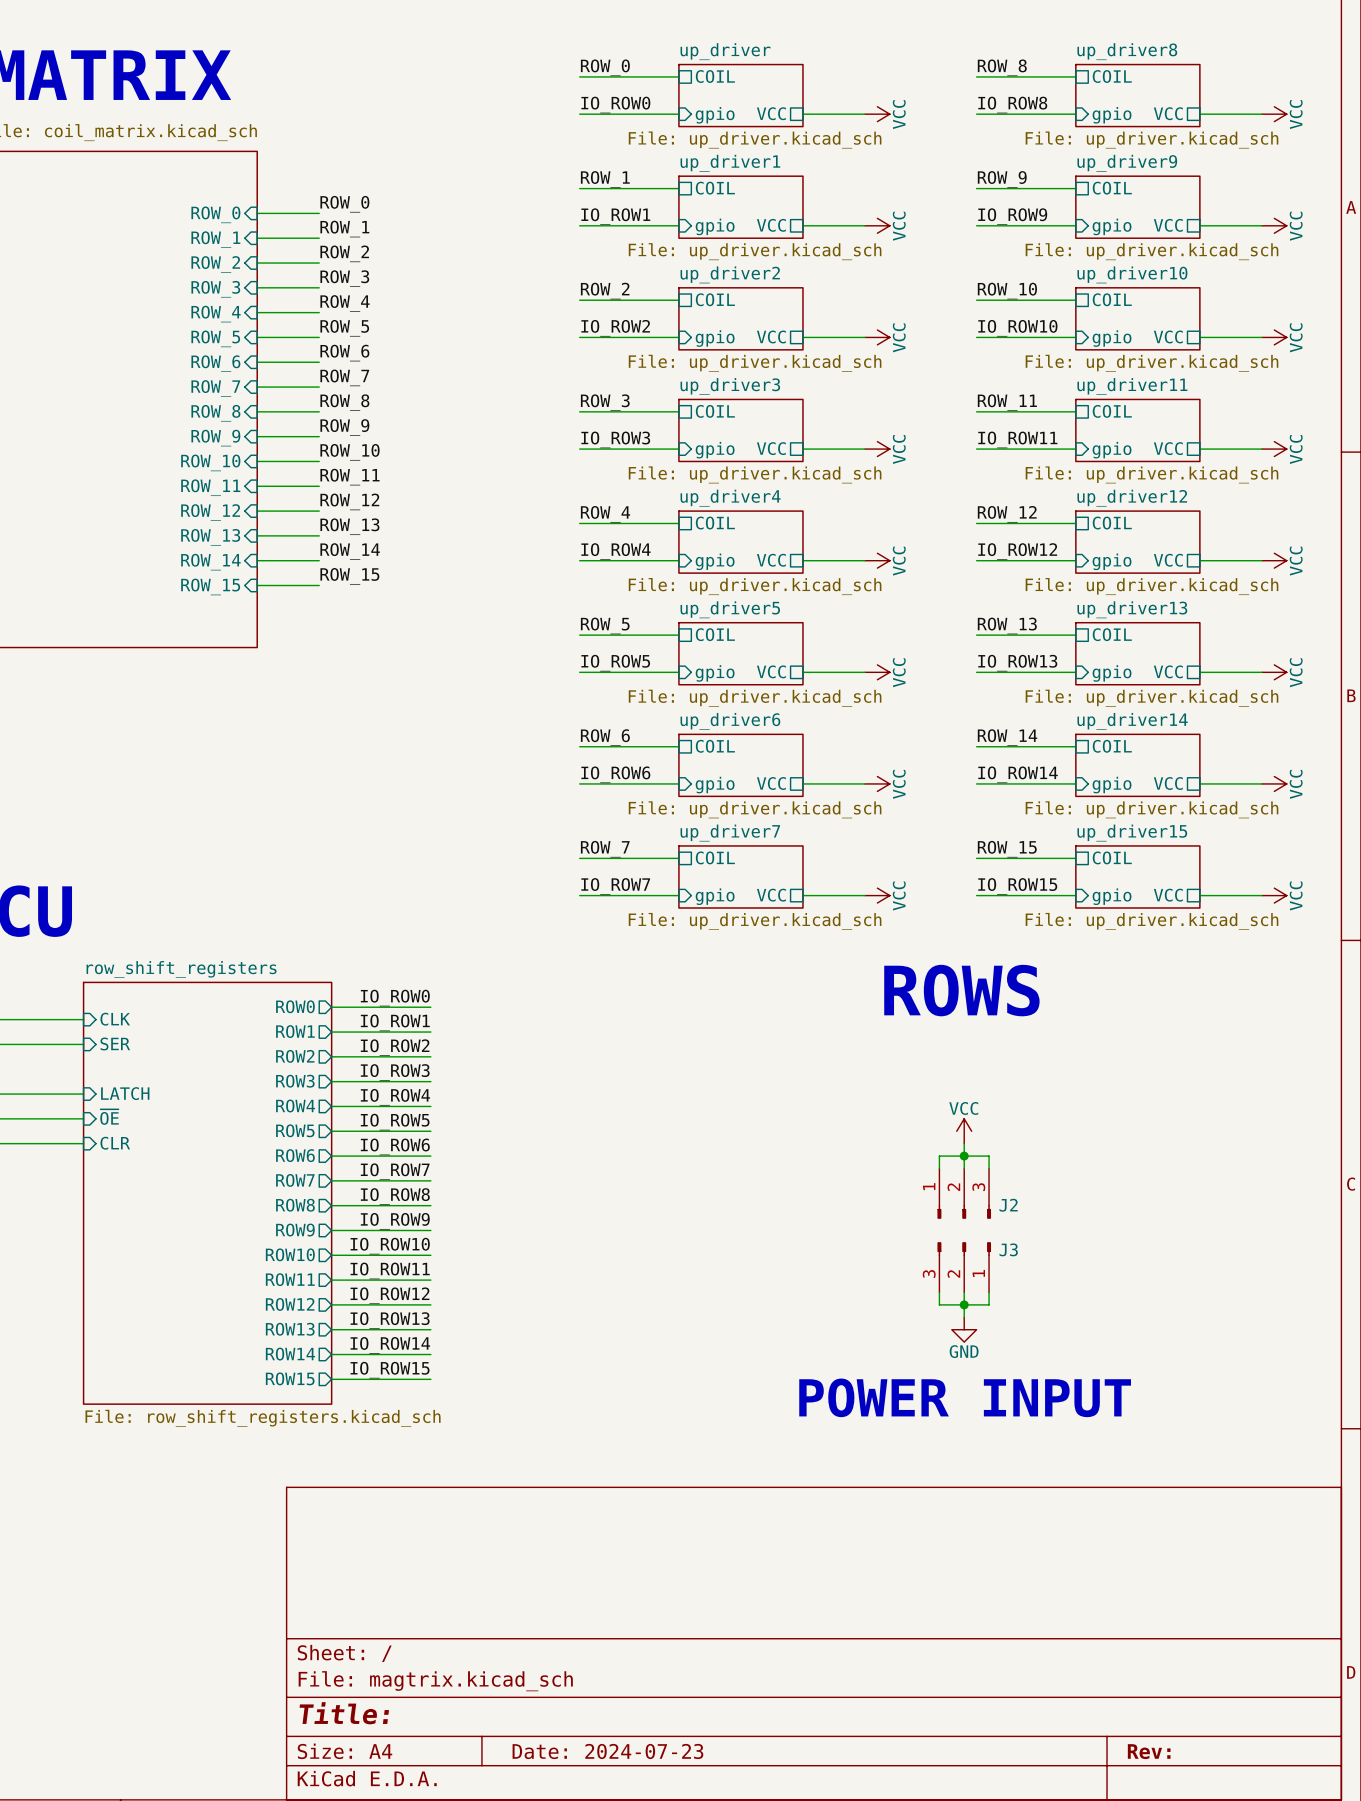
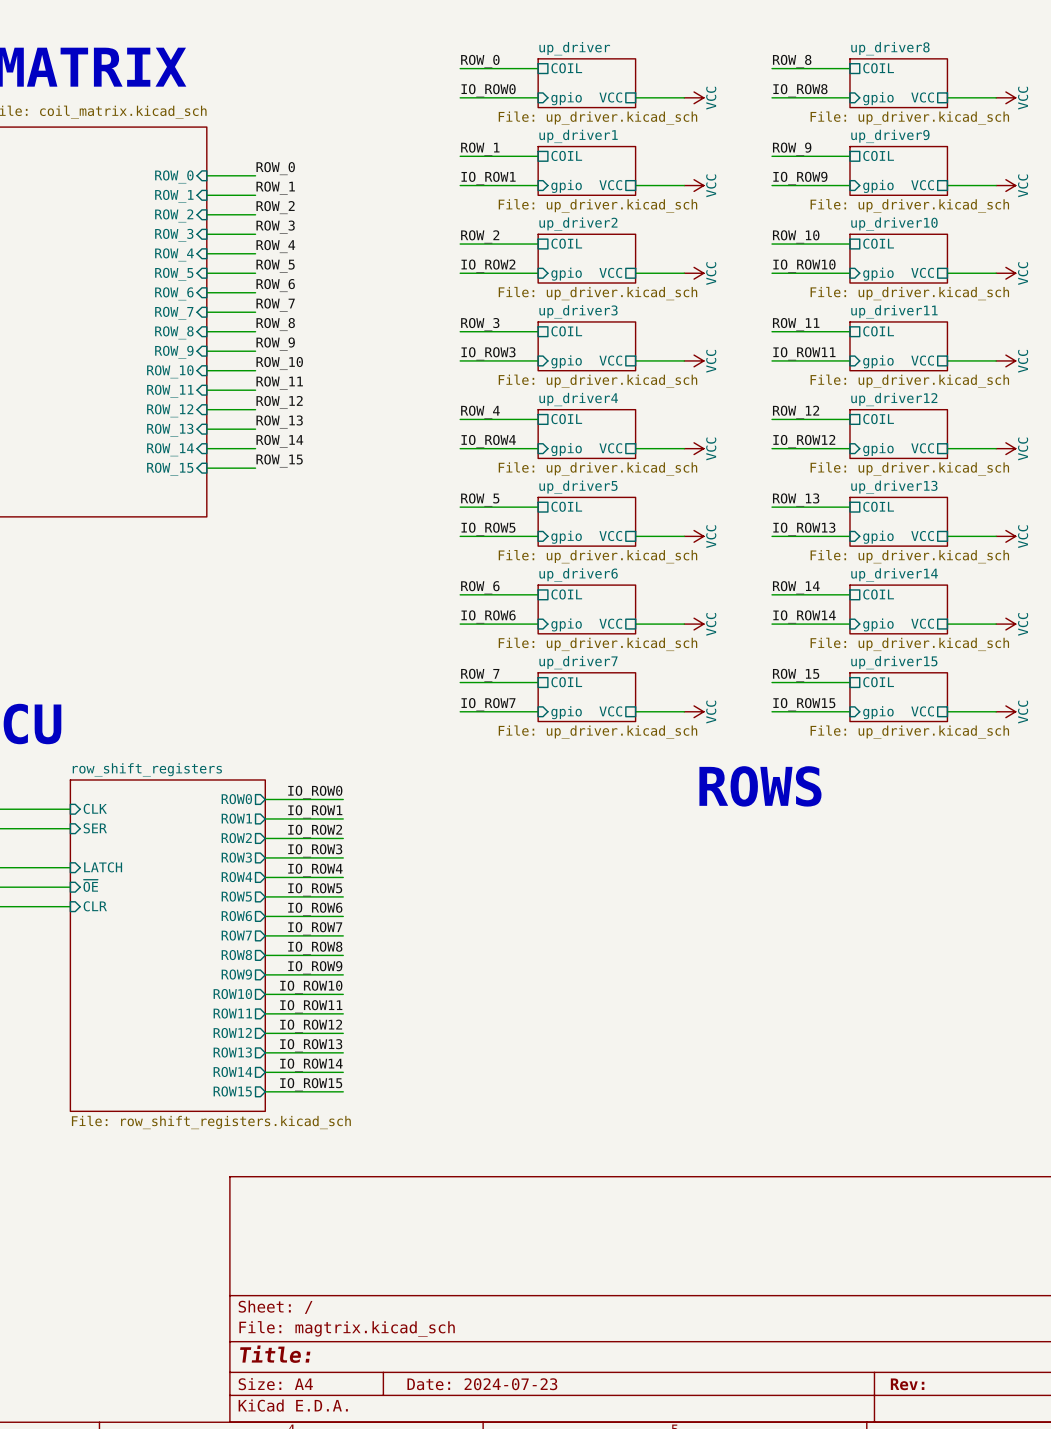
power symbol: VCC (964, 1131) -> none
wire: (964, 1143) (964, 1168) -> none
junction: (964, 1156) -> none
wire: (939, 1168) (939, 1156) (989, 1156) (989, 1168) -> none
J2: (964, 1193) -> none
J3: (964, 1267) -> none
wire: (939, 1292) (939, 1304) (989, 1304) (989, 1292) -> none
wire: (964, 1292) (964, 1317) -> none
junction: (964, 1304) -> none
power symbol: GND (964, 1329) -> none
text: POWER INPUT (965, 1397) -> none

